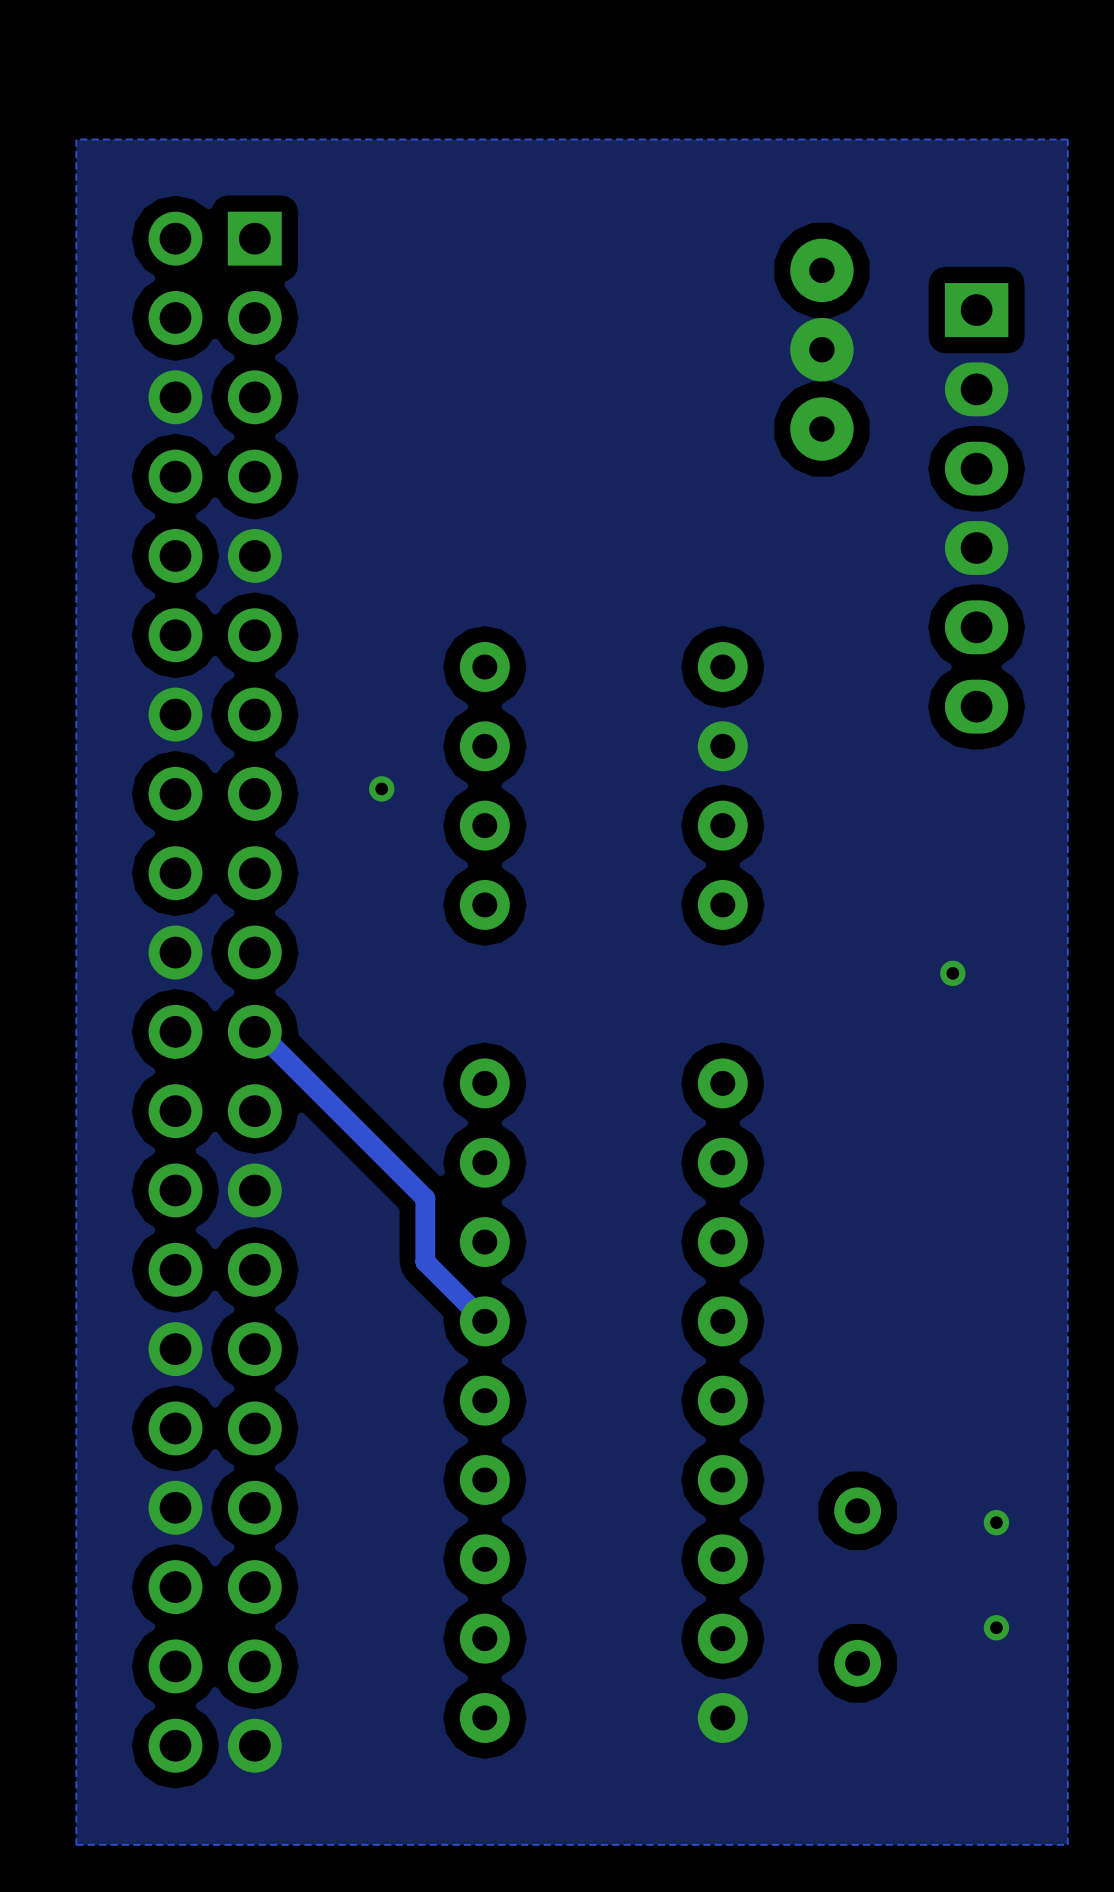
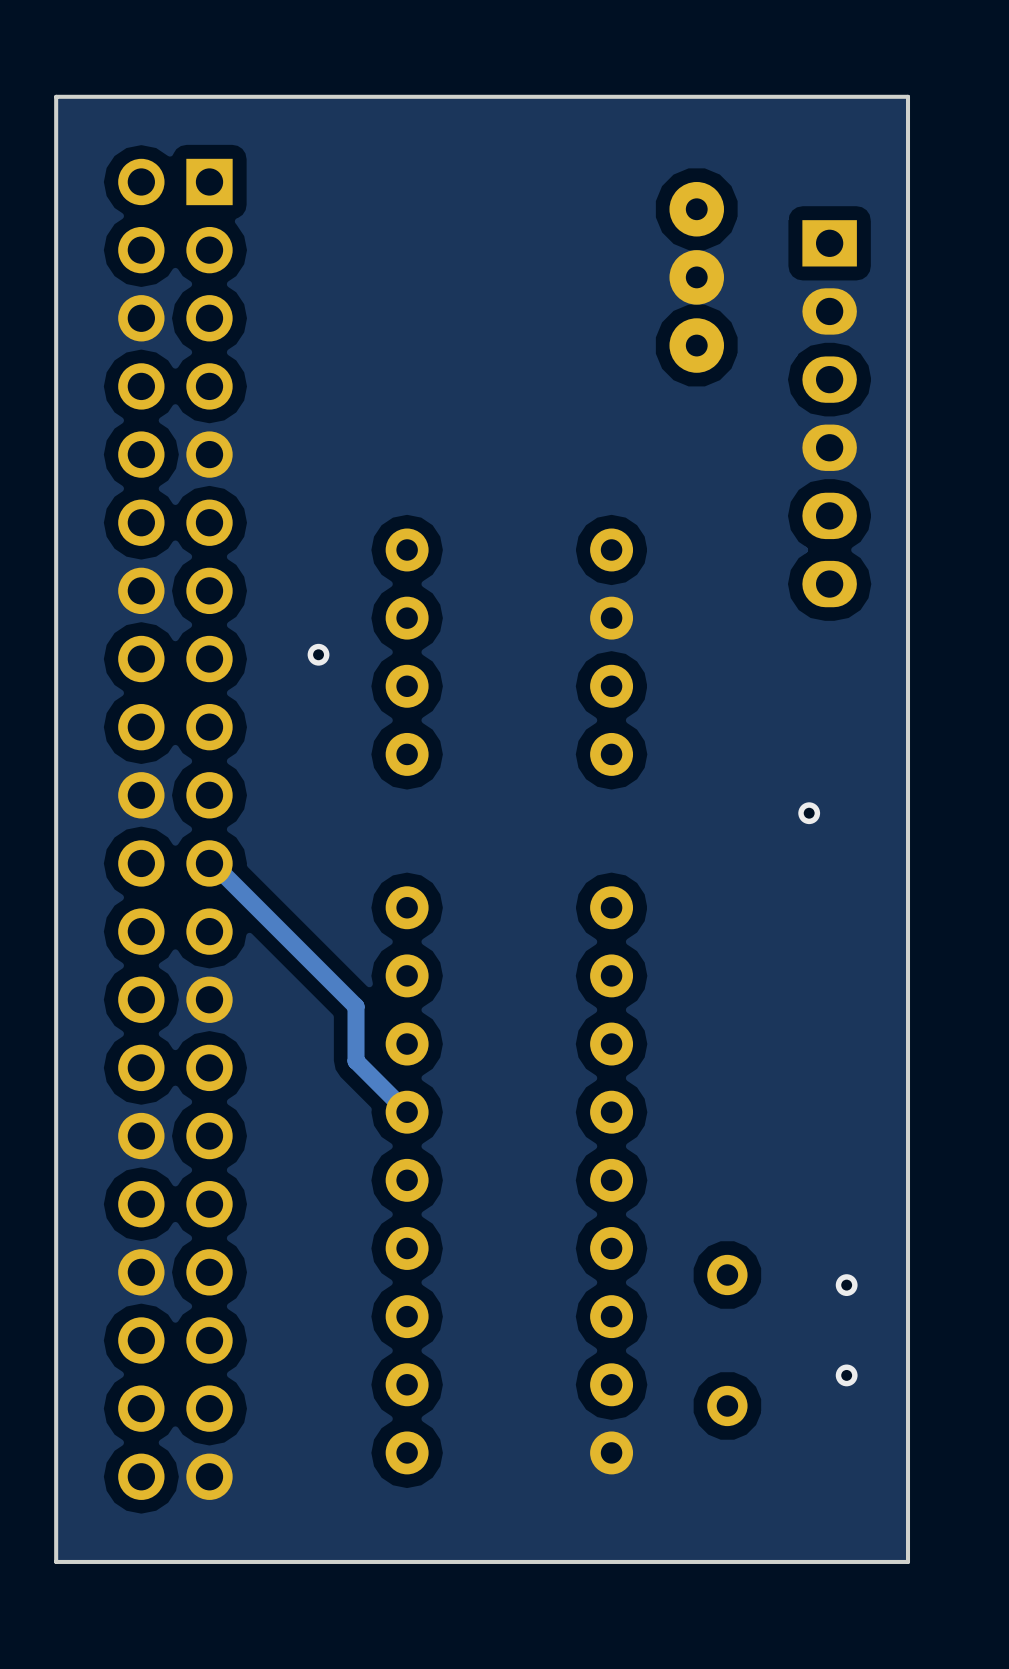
board edge: none -> (908, 96) (56, 96) (56, 1561) (908, 1561) (908, 96)

